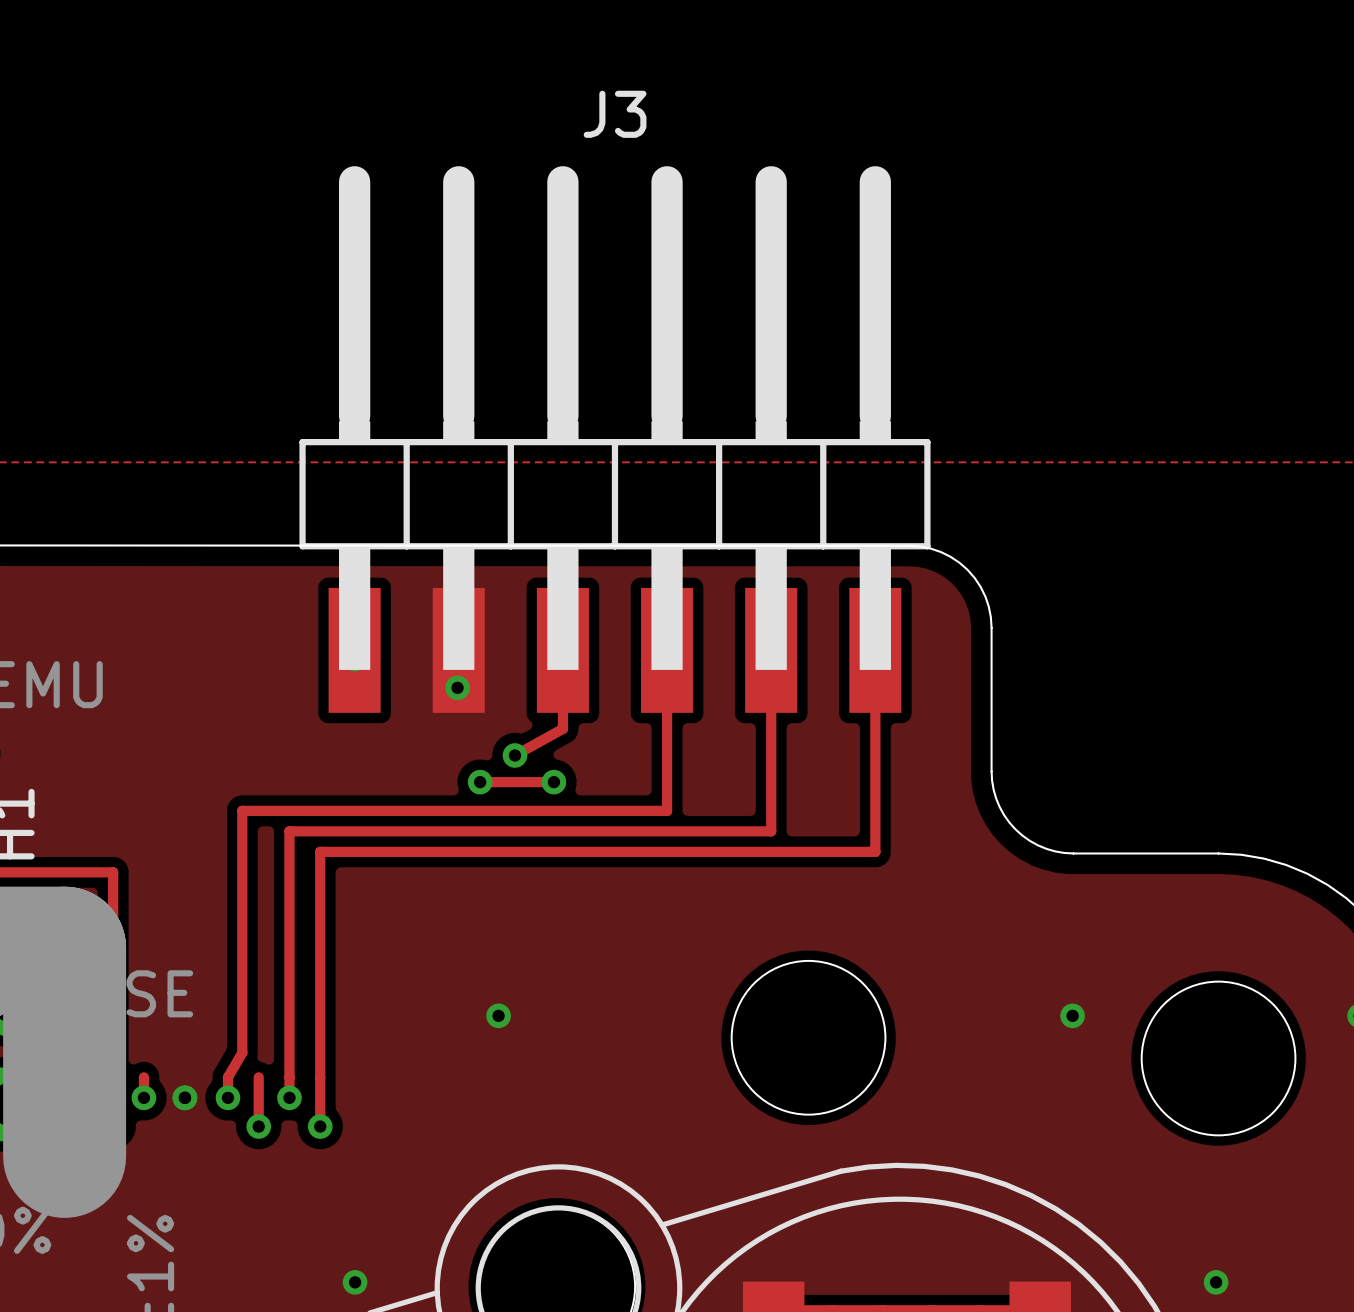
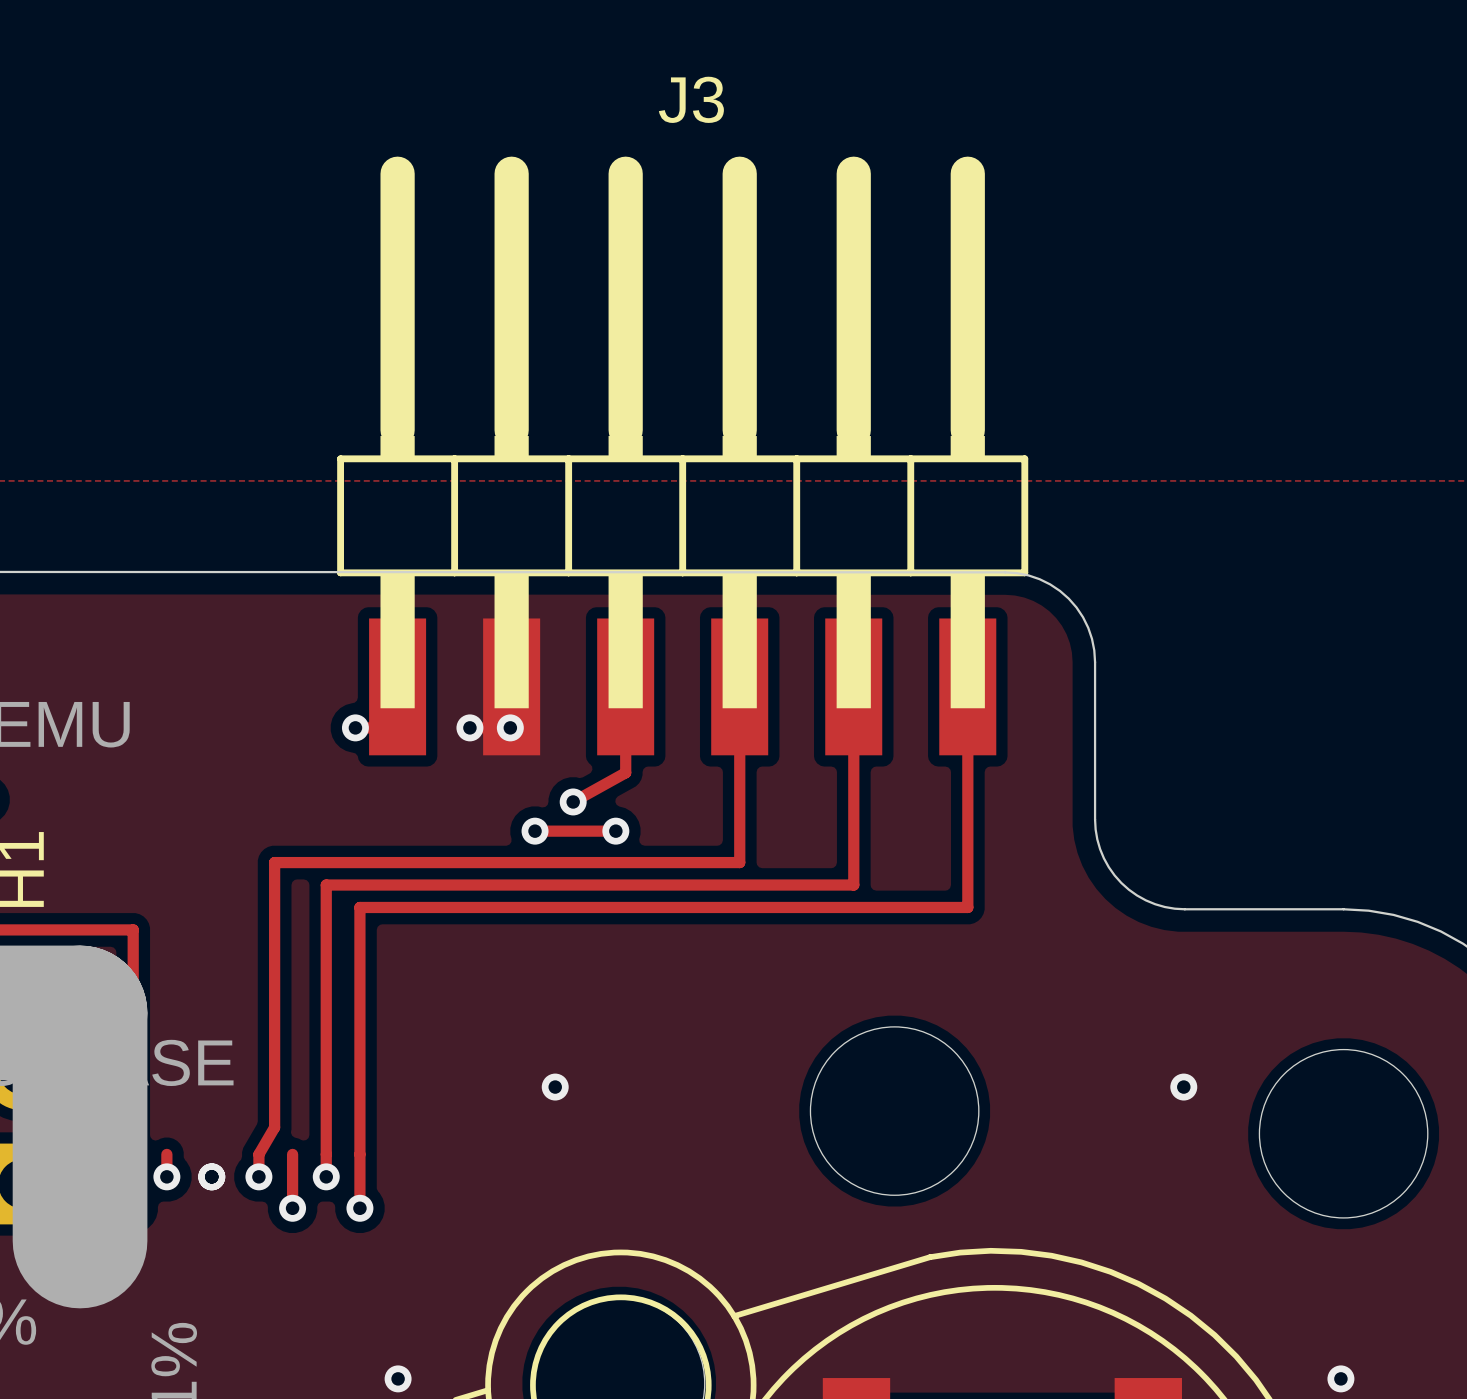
via: none -> (355, 727)
via: none -> (469, 727)

